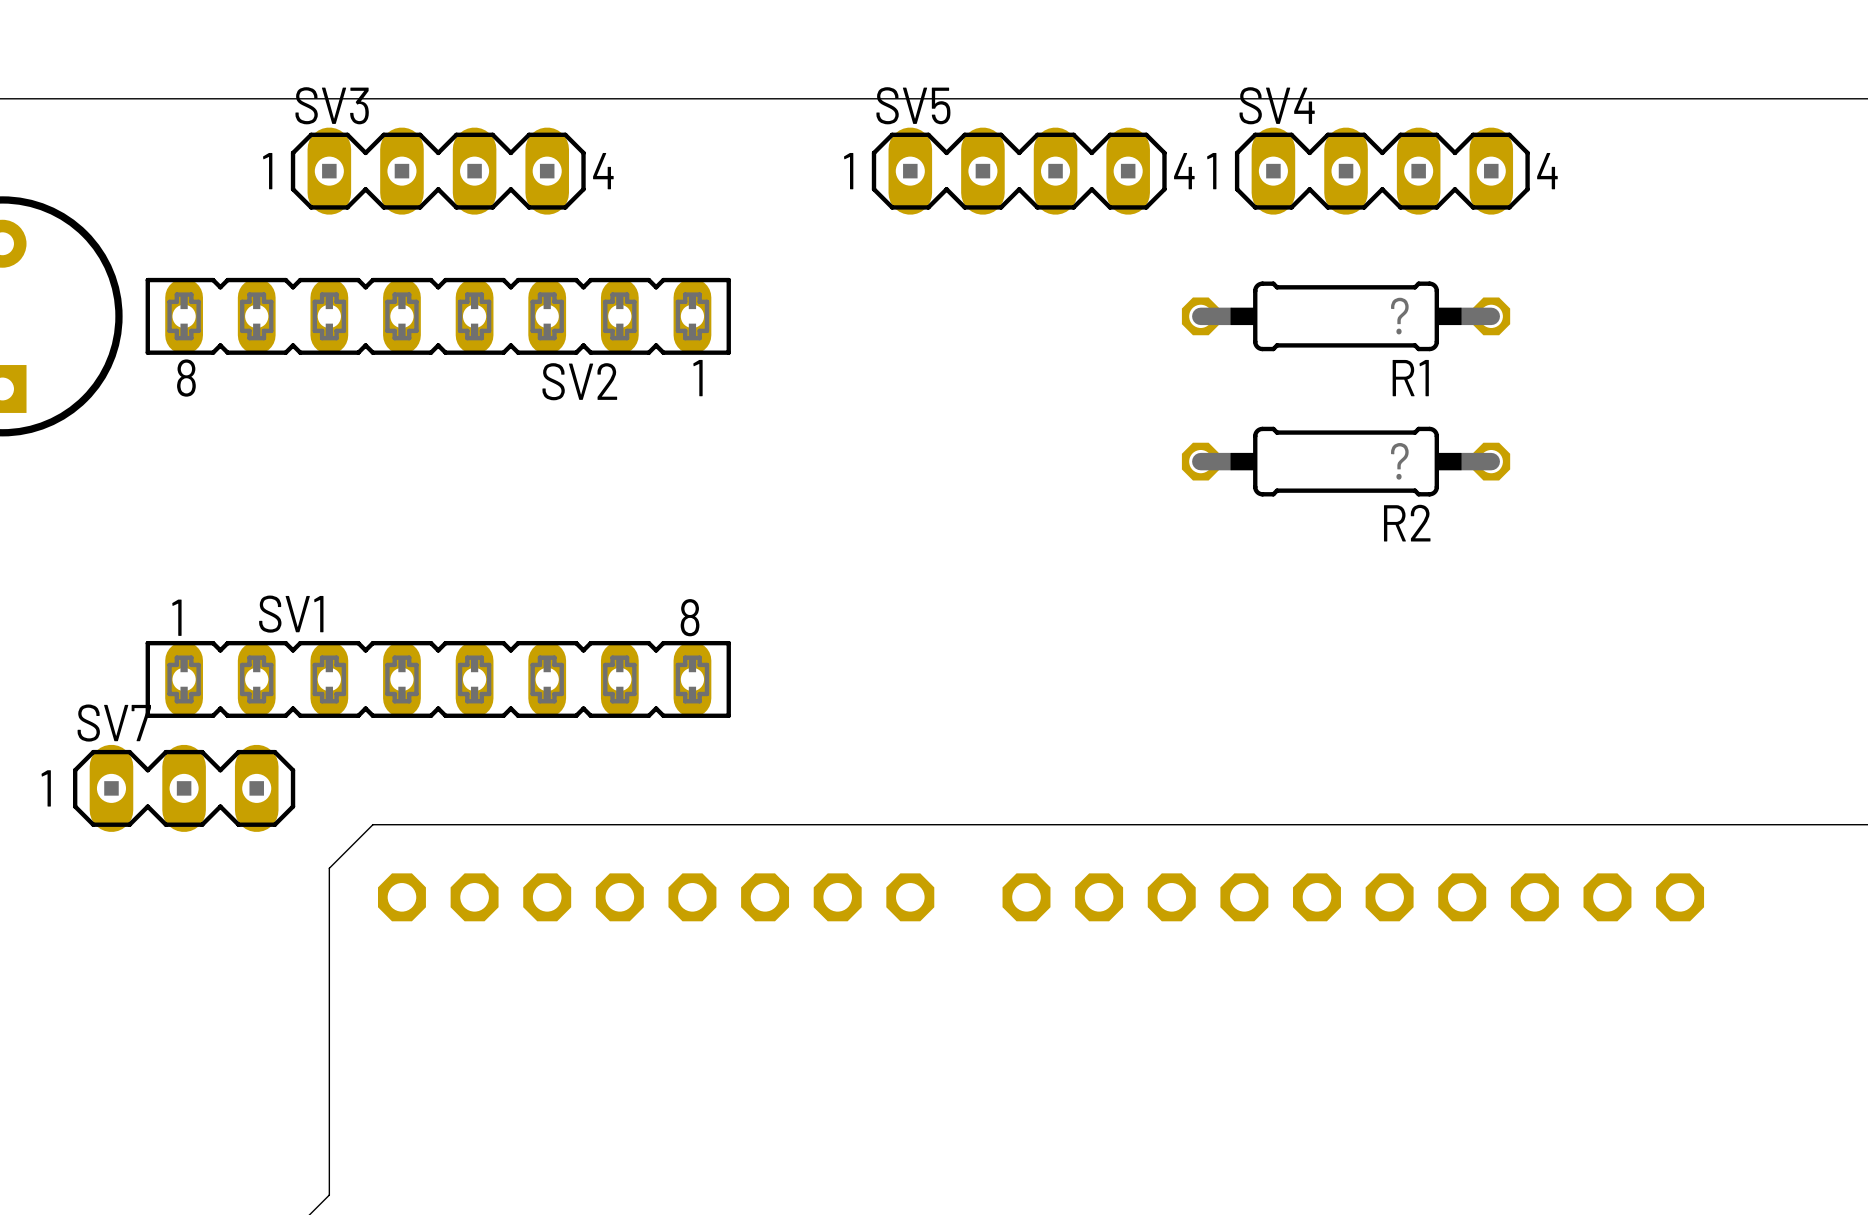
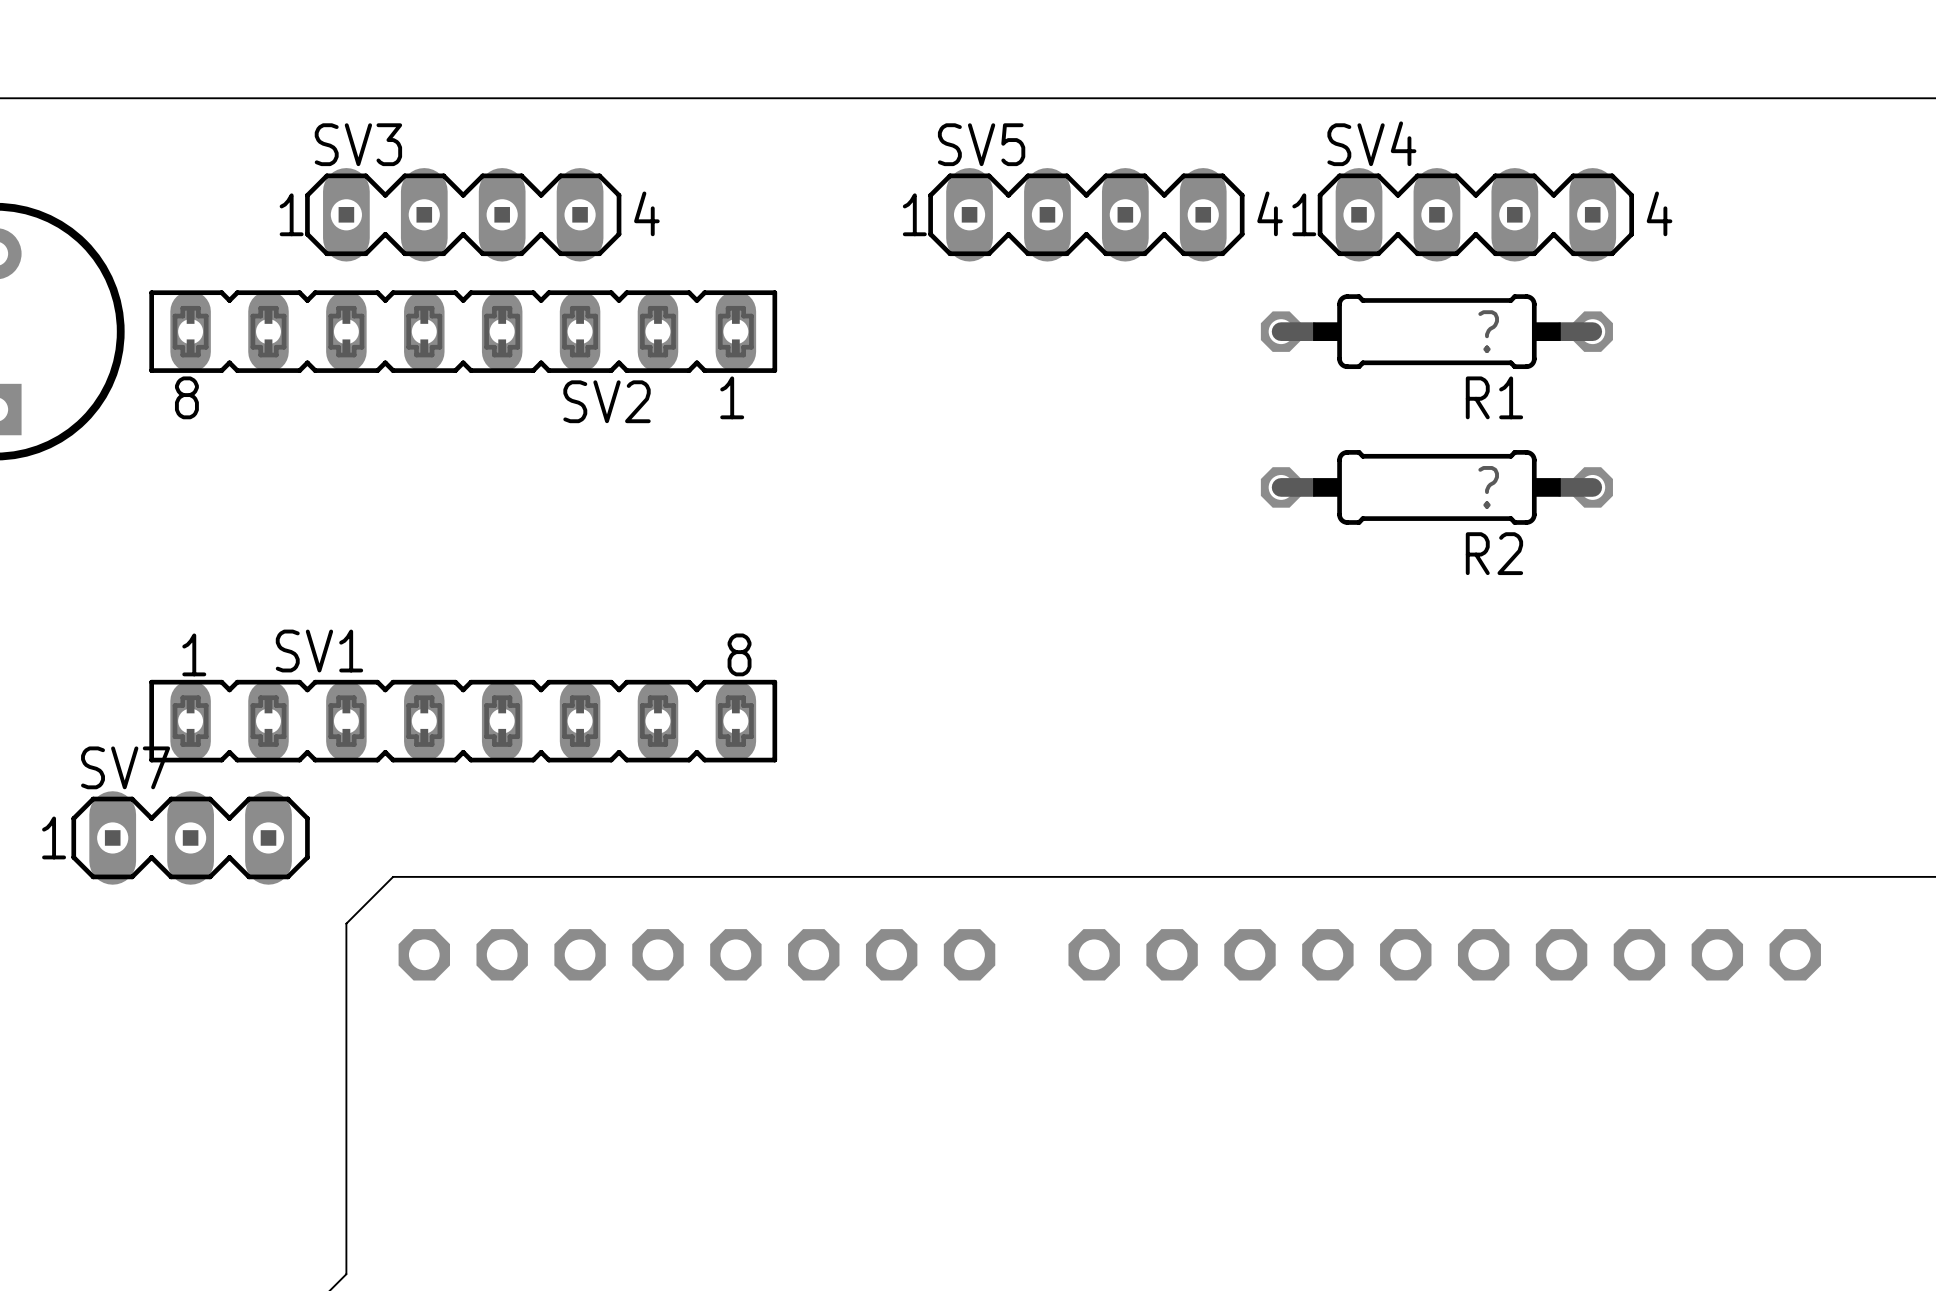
SV3 position: (438, 171) -> (463, 214)
SV5 position: (1019, 171) -> (1086, 214)
SV4 position: (1382, 171) -> (1475, 214)

